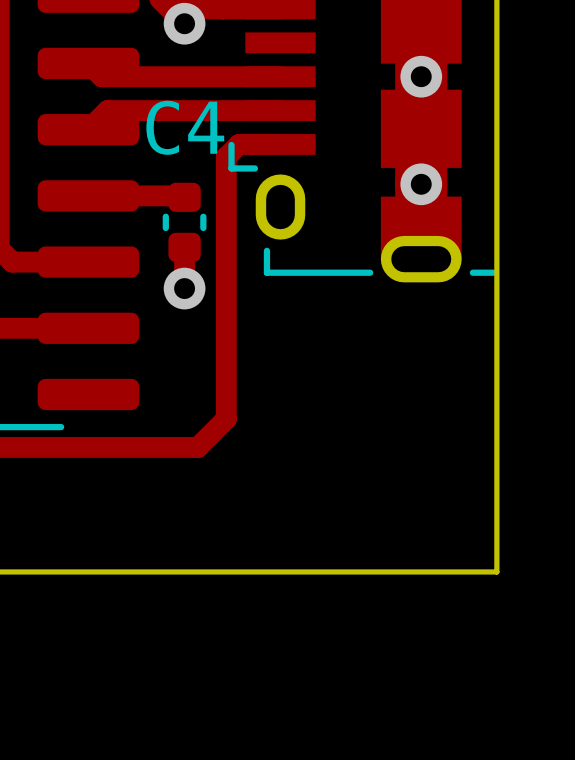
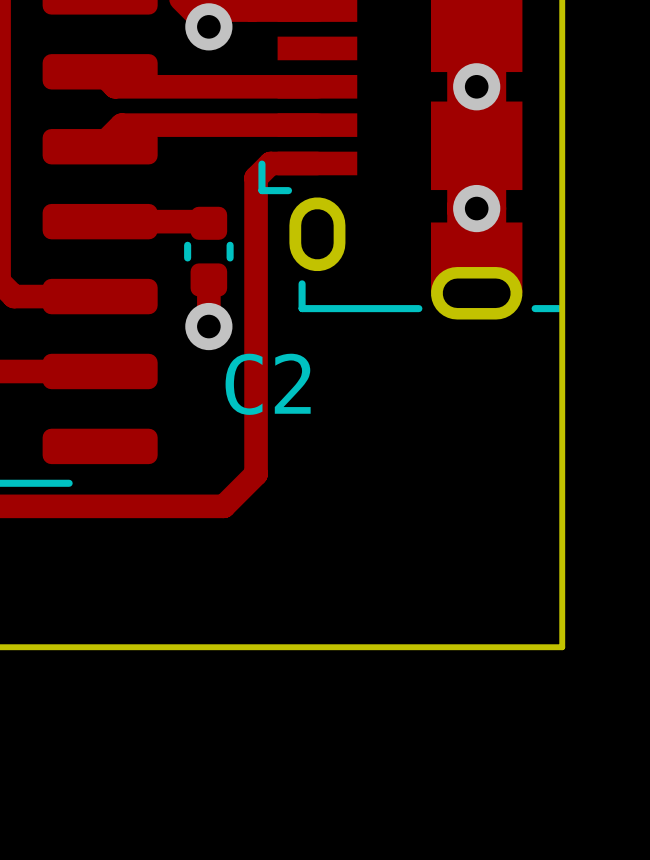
C4 name: C4 (185, 127) -> C2 (268, 384)

